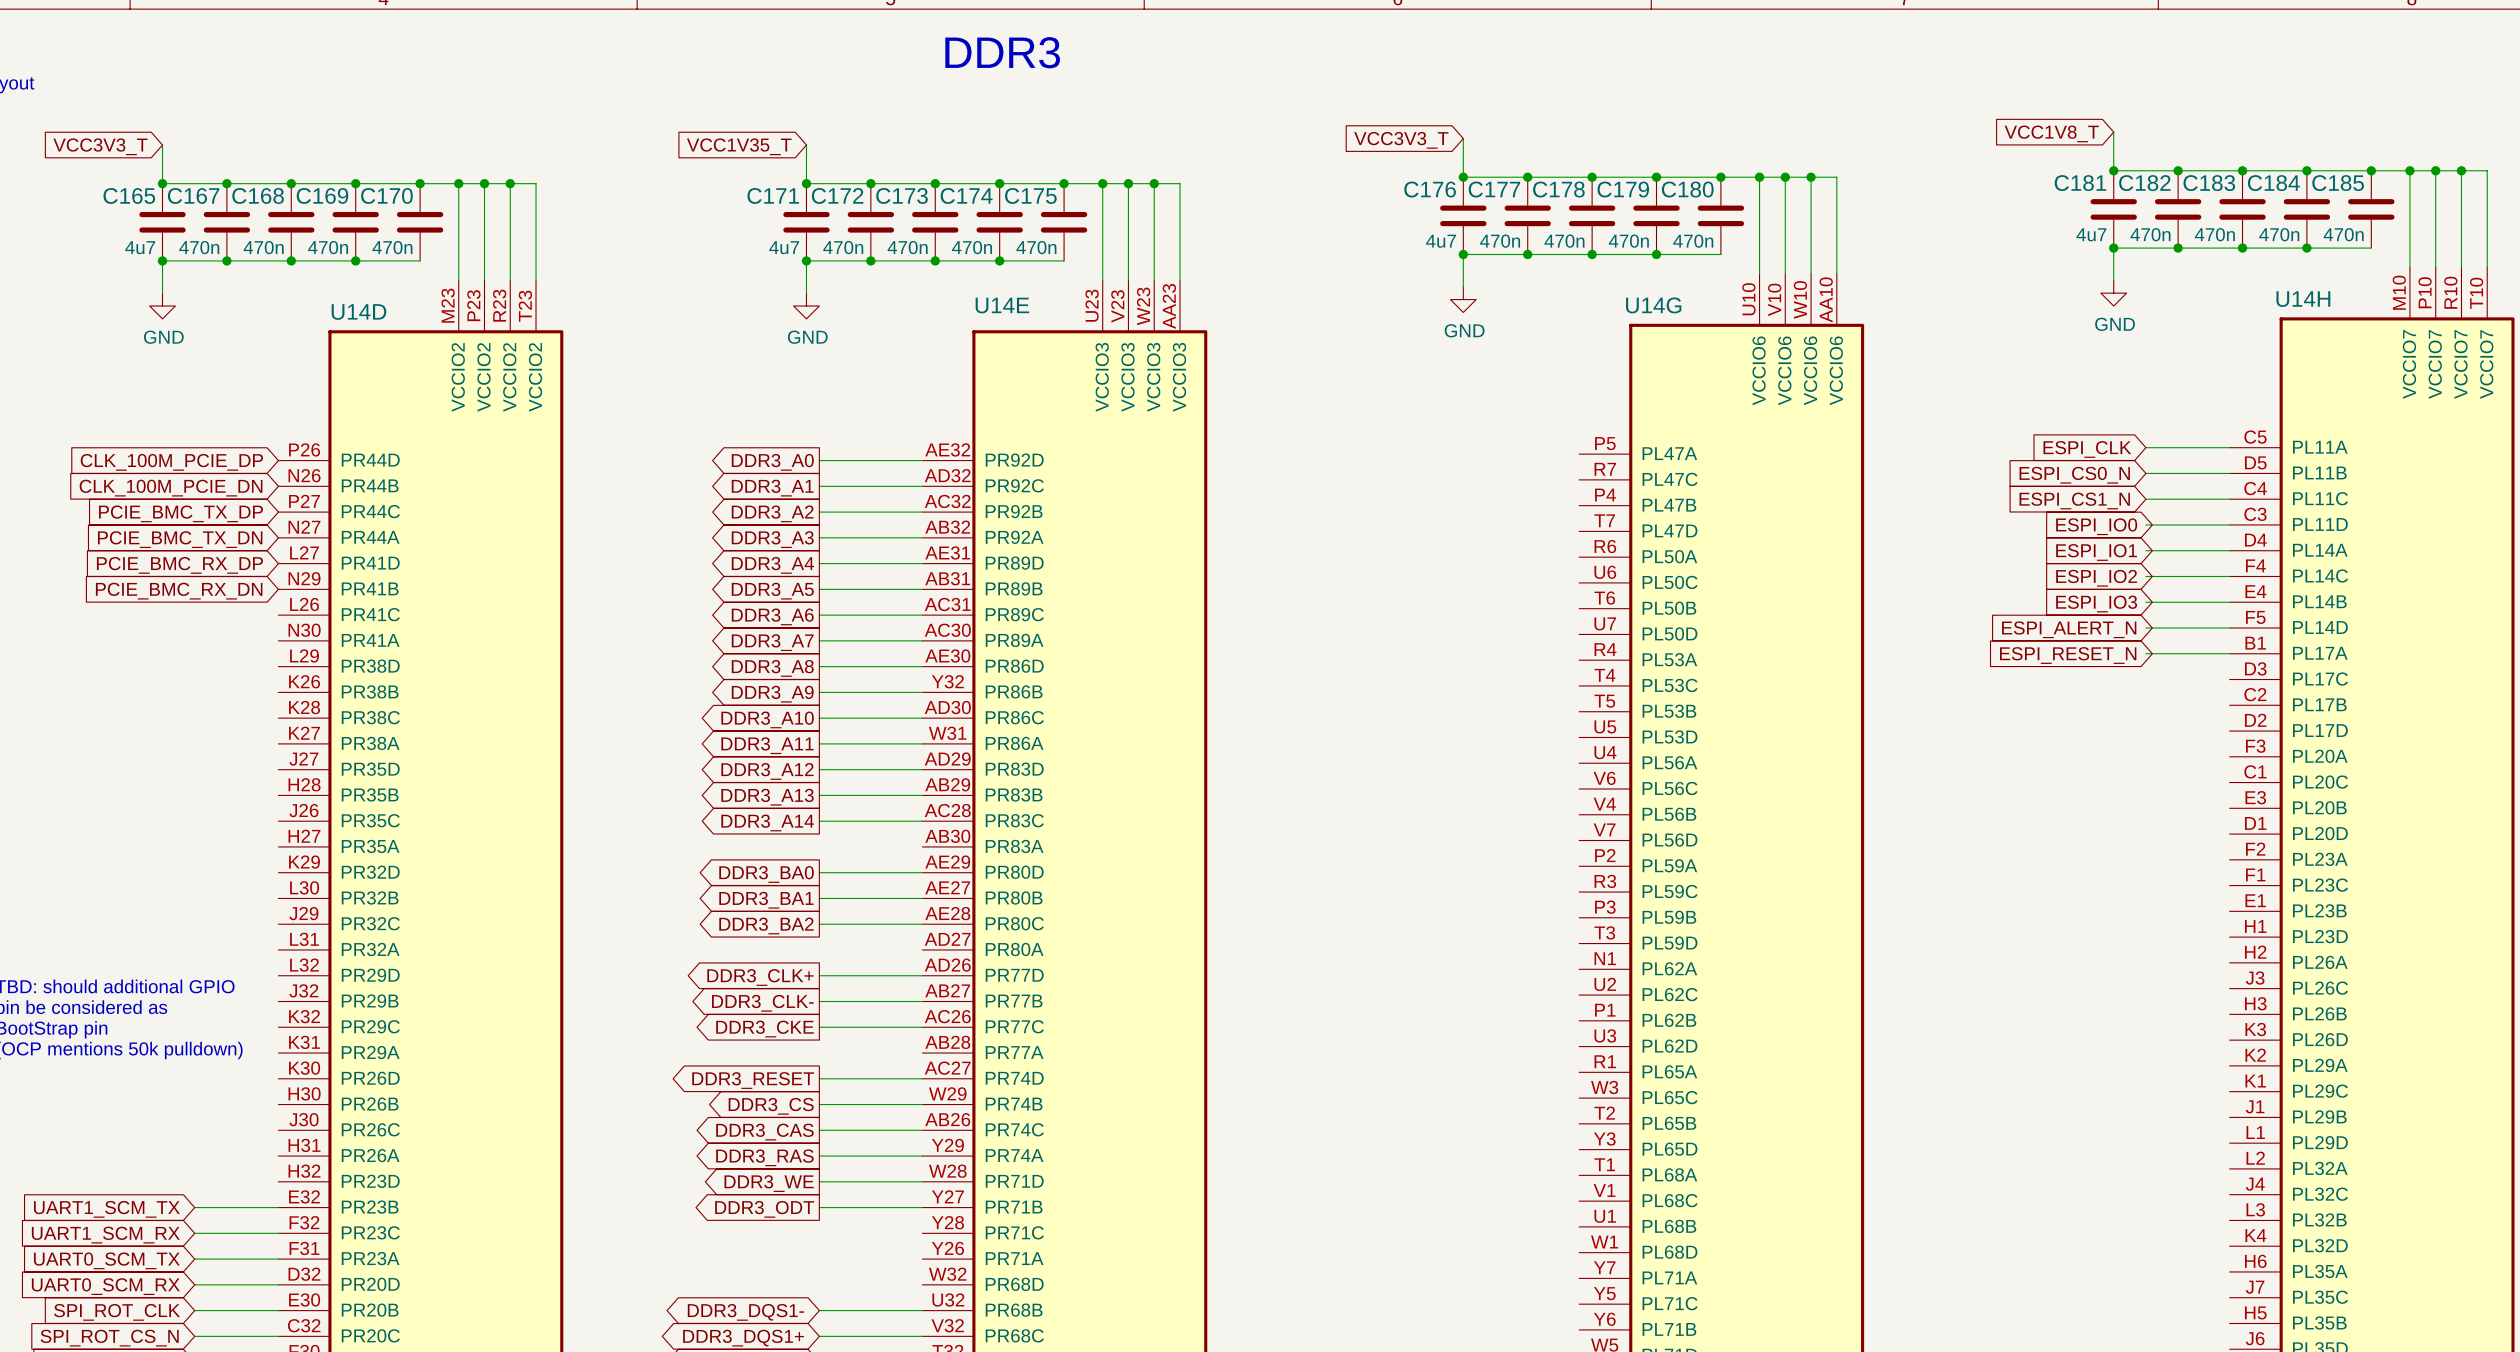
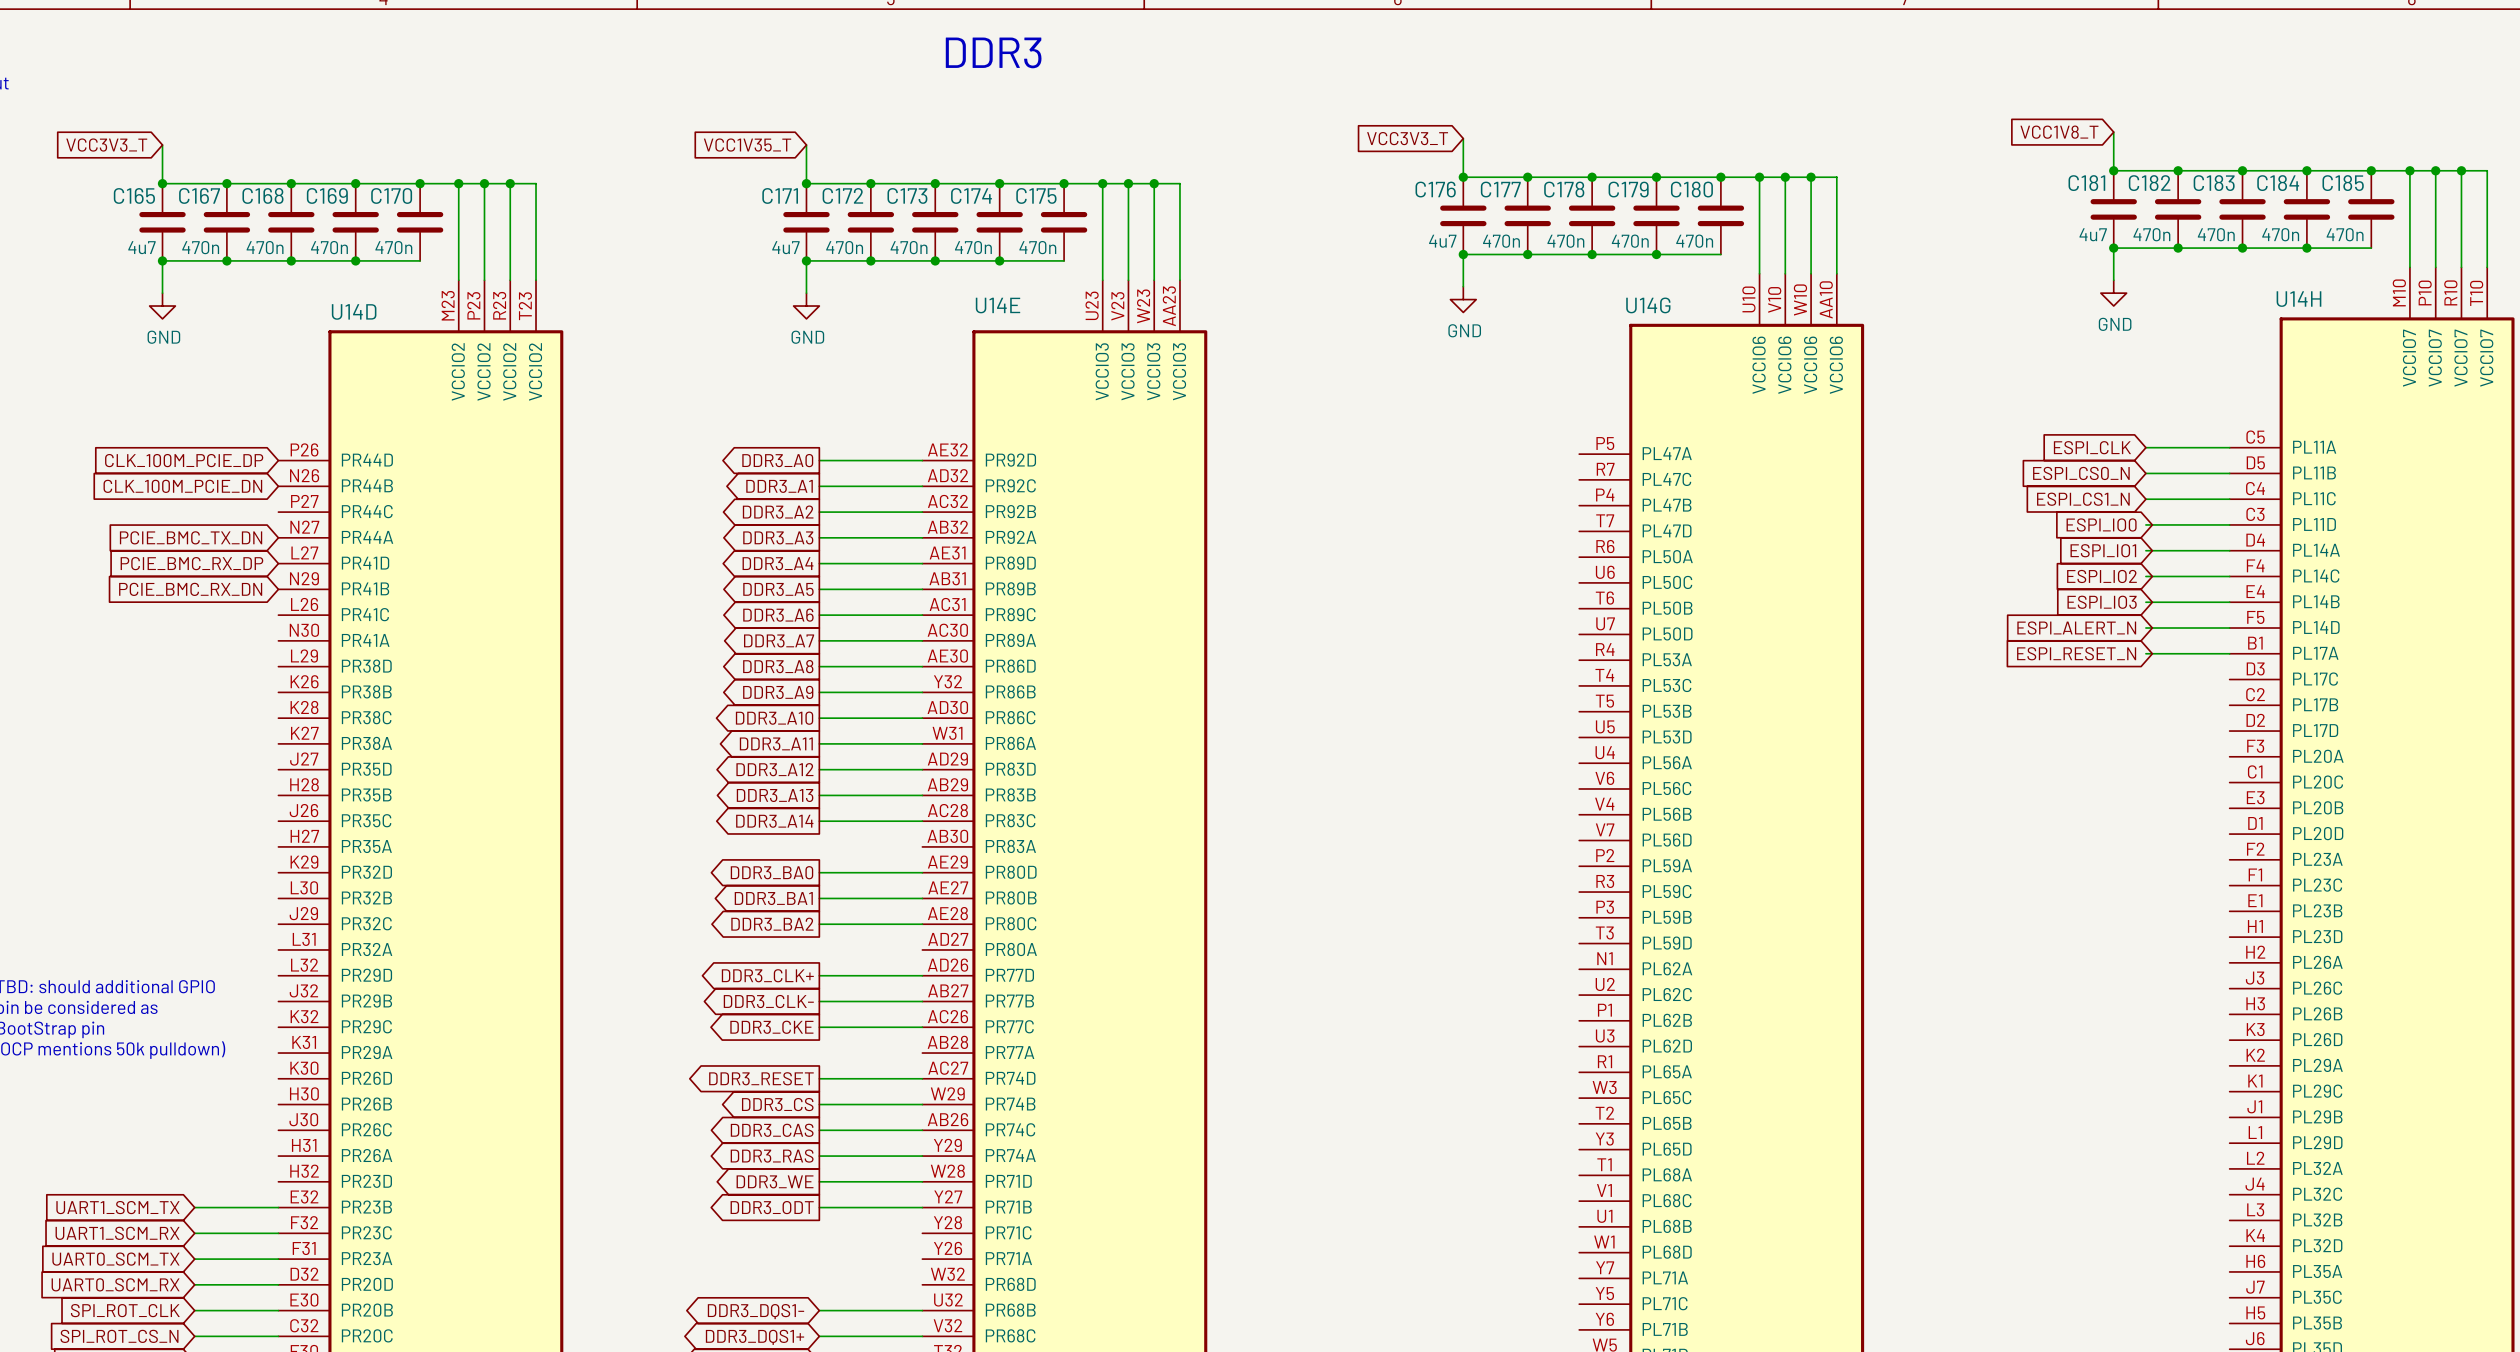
global label: PCIE_BMC_TX_DP (180, 513) -> none

